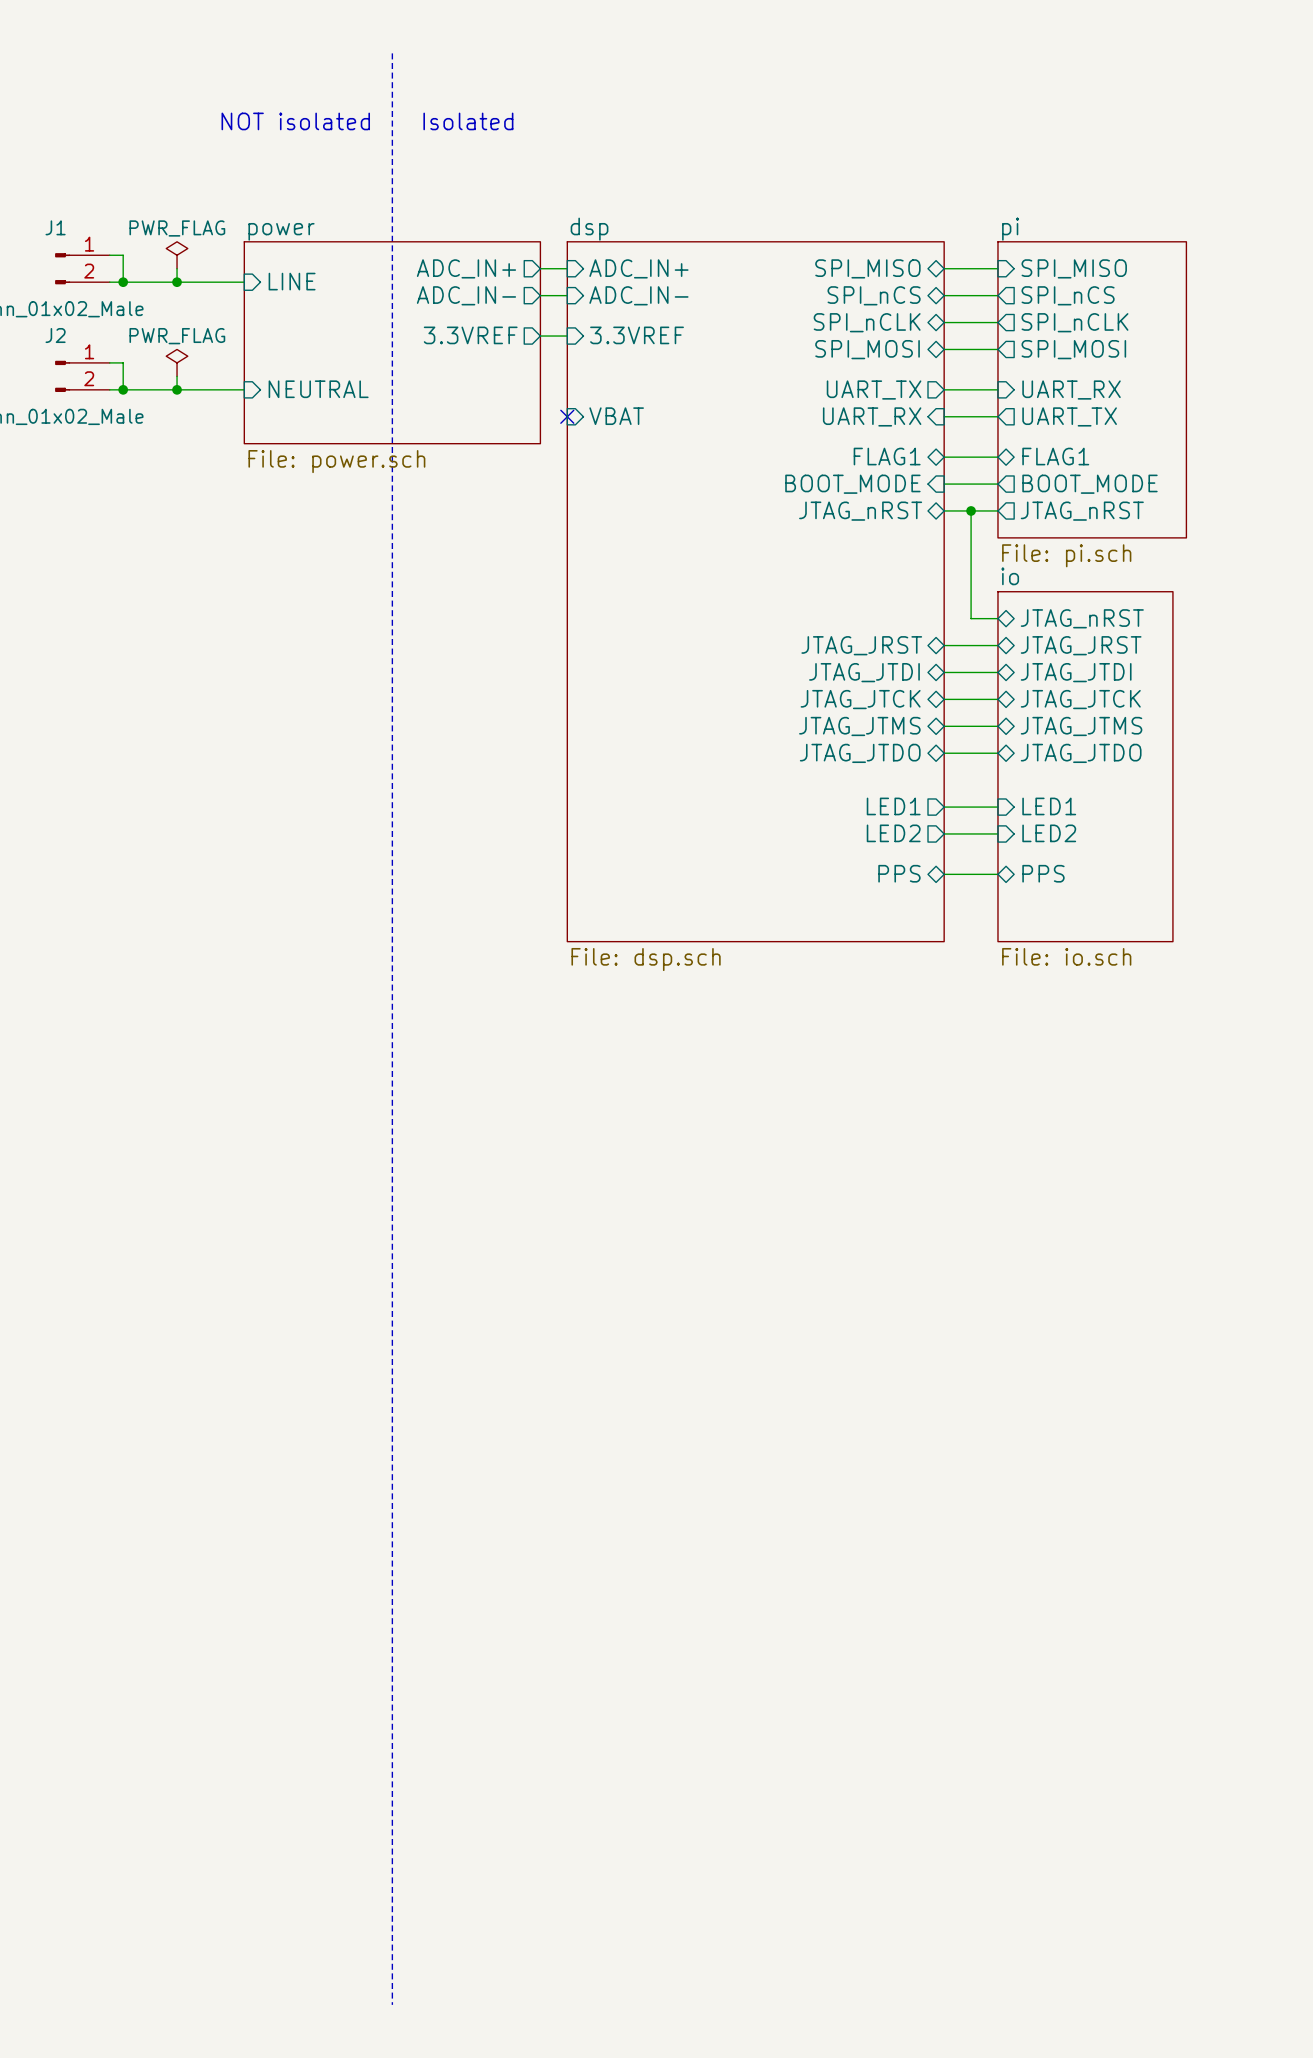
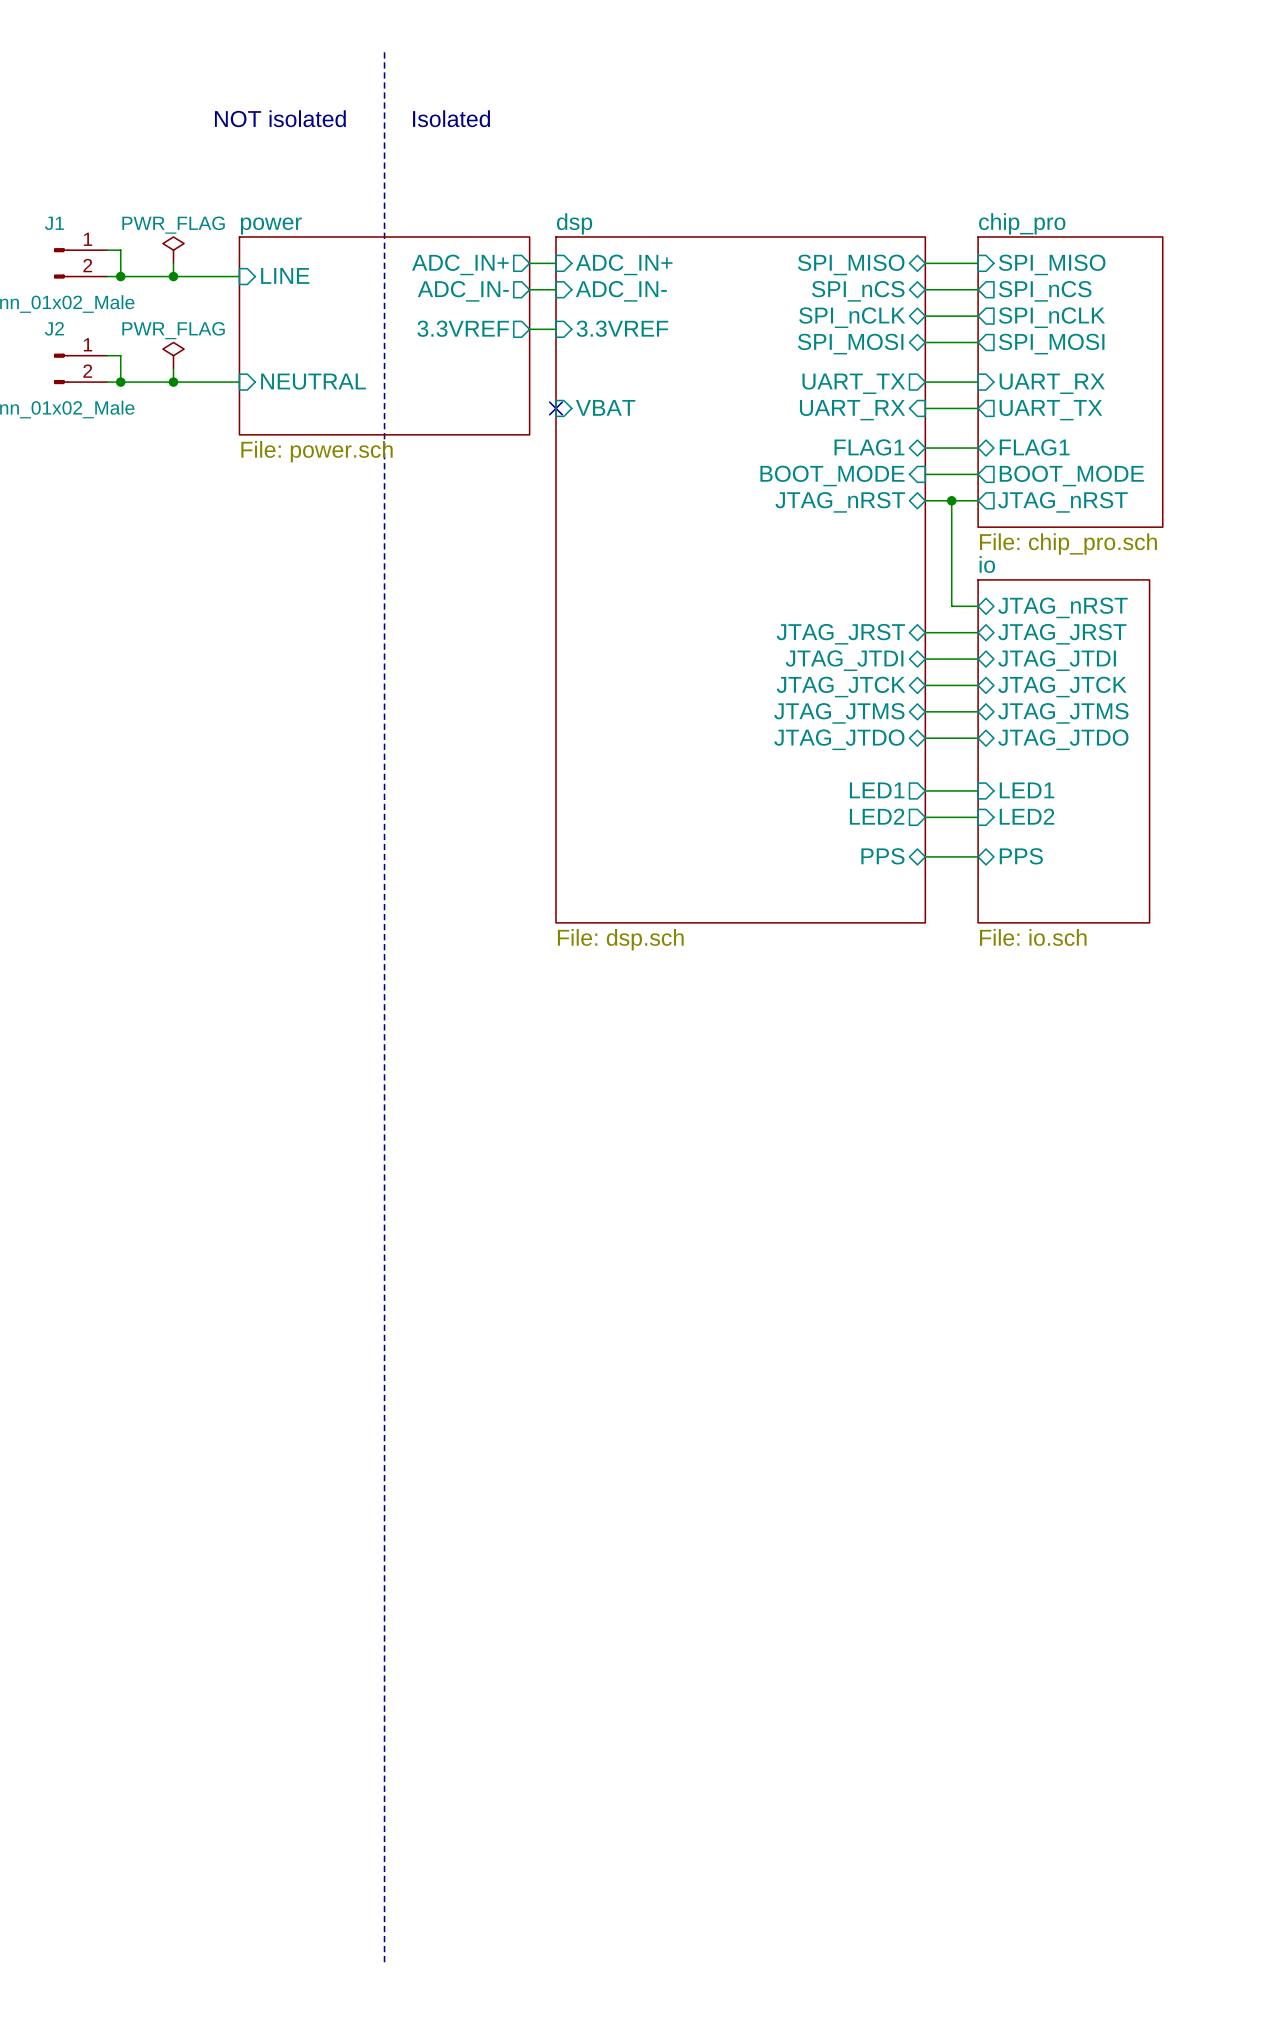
sheet pi name: pi (1010, 229) -> chip_pro (1022, 223)
sheet pi value: File: pi.sch (1066, 555) -> File: chip_pro.sch (1068, 544)

